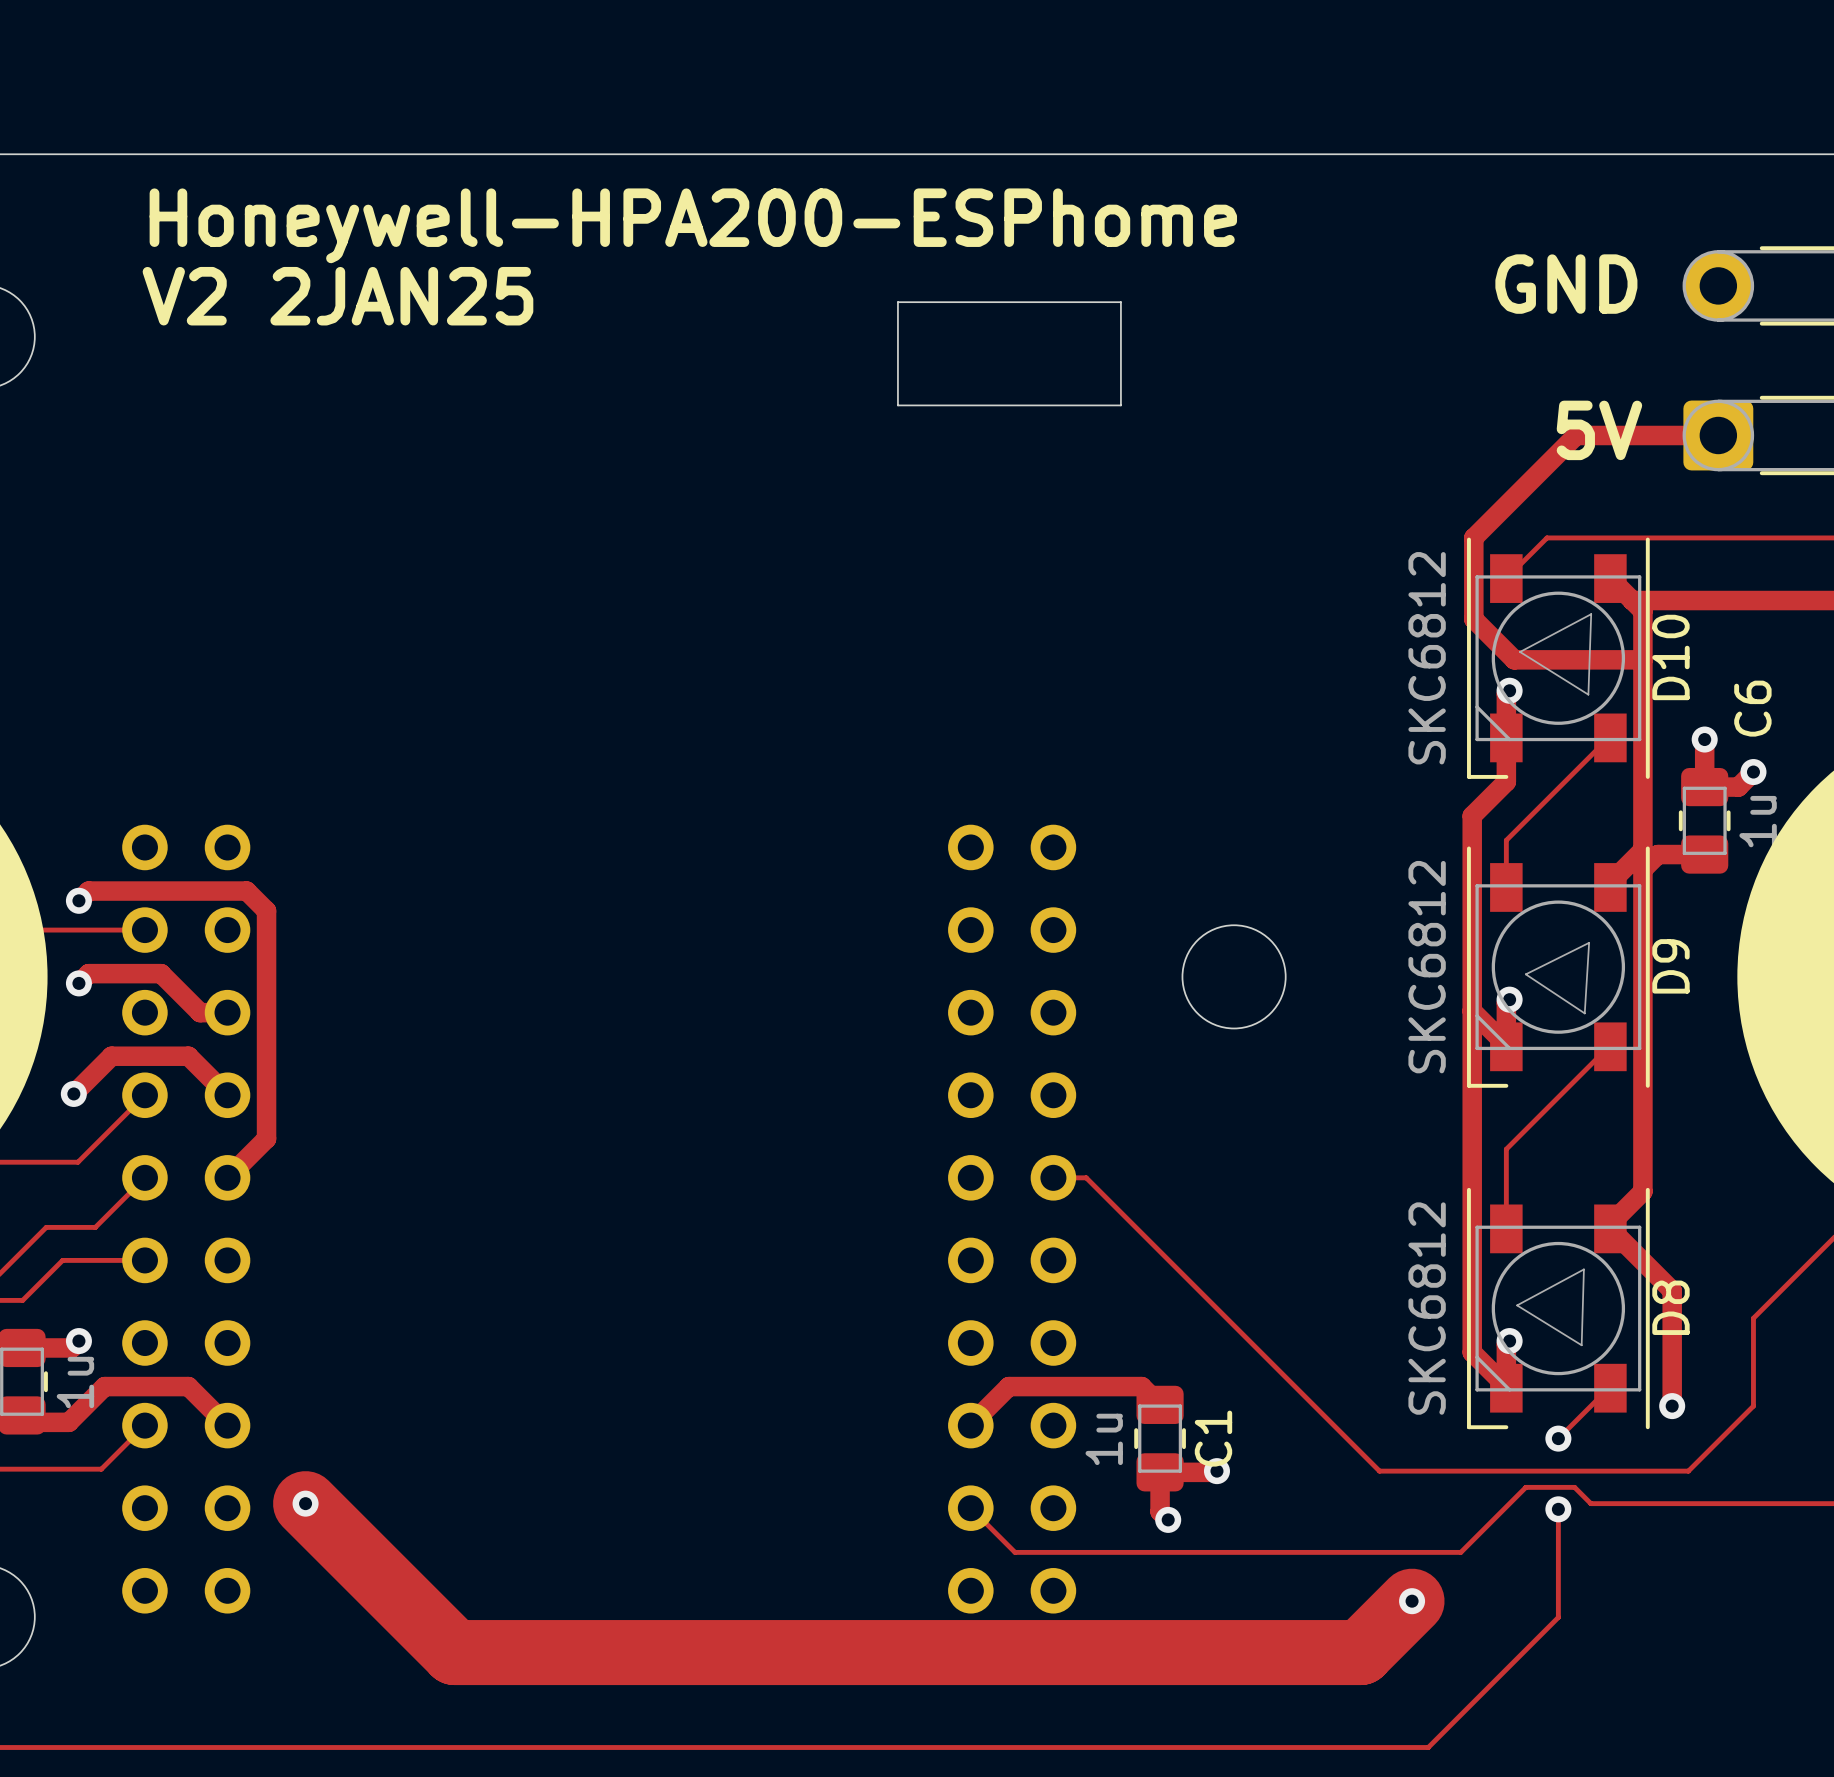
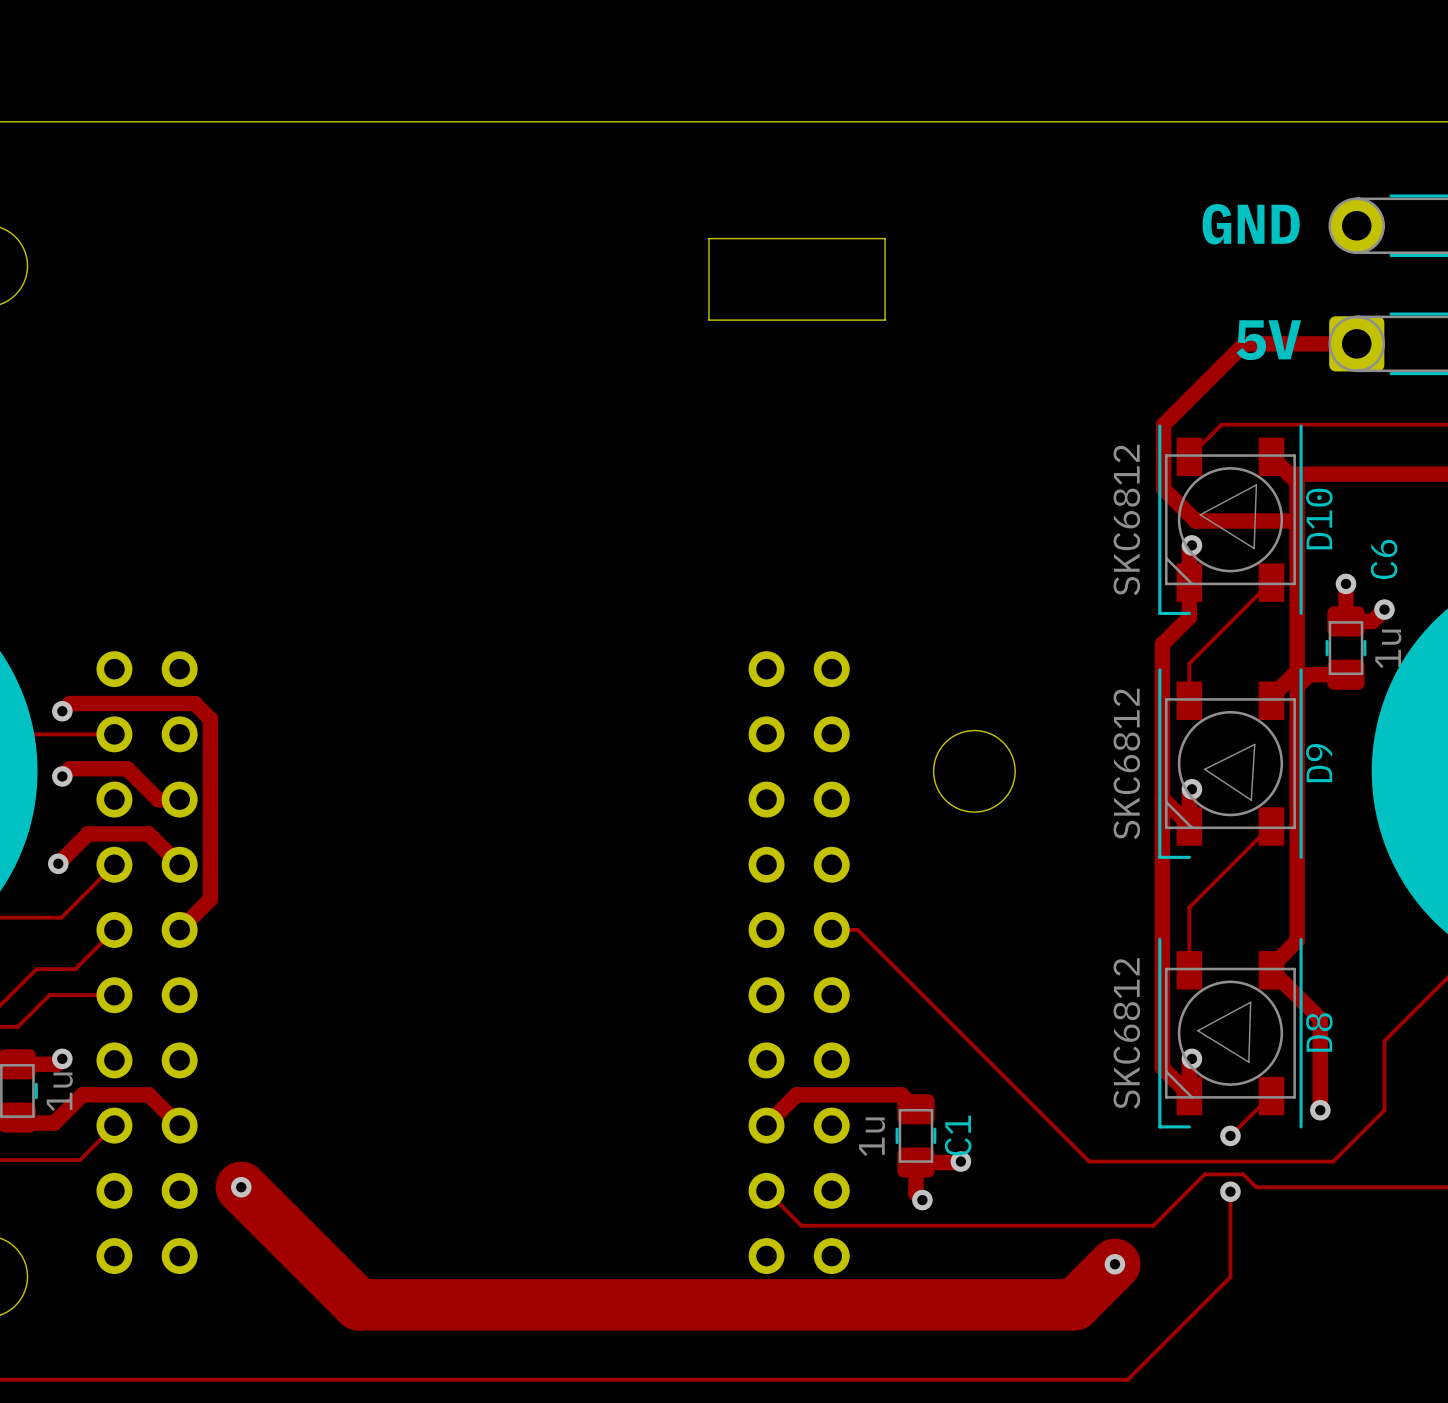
text: Honeywell-HPA200-ESPhome (693, 225) -> none
text: V2 2JAN25 (337, 296) -> none

